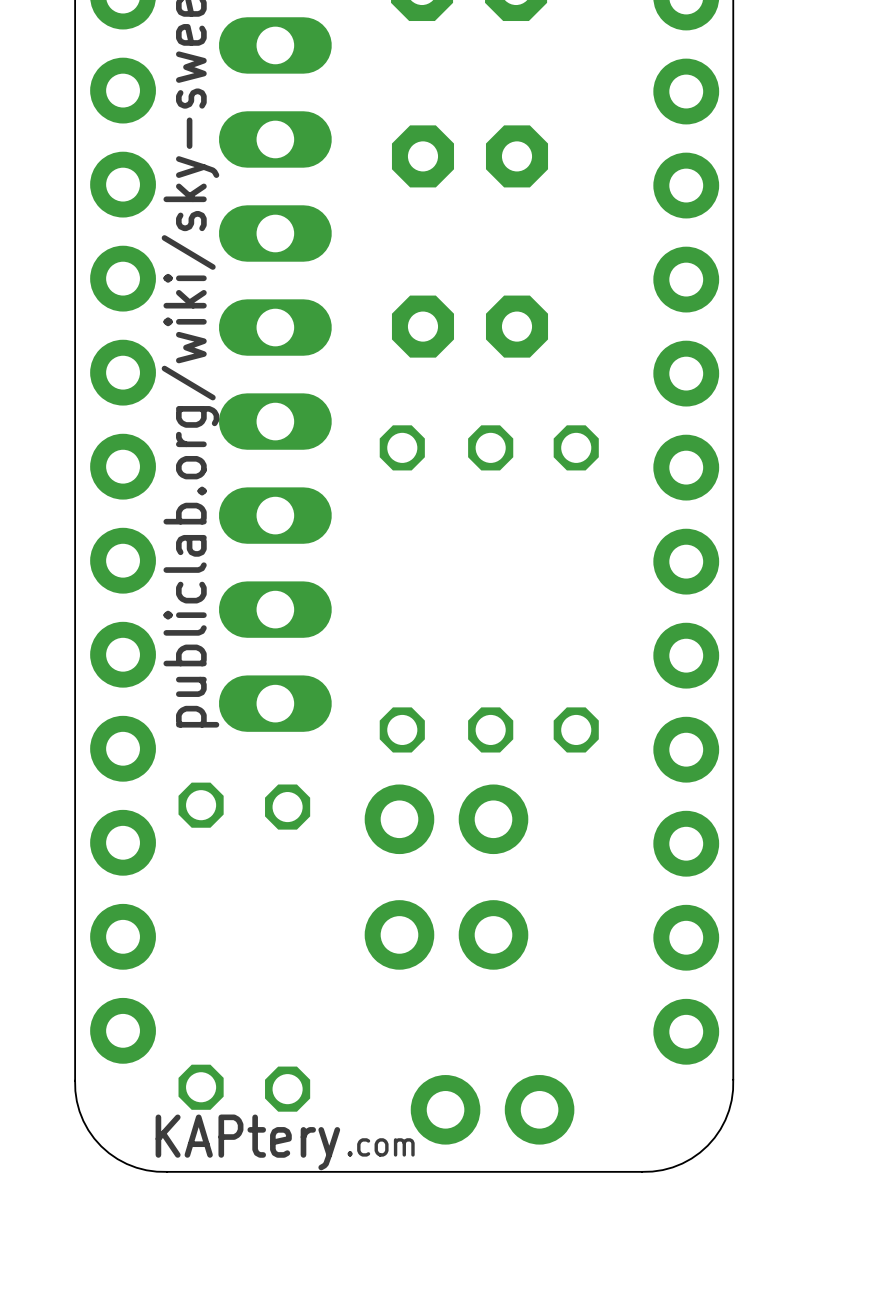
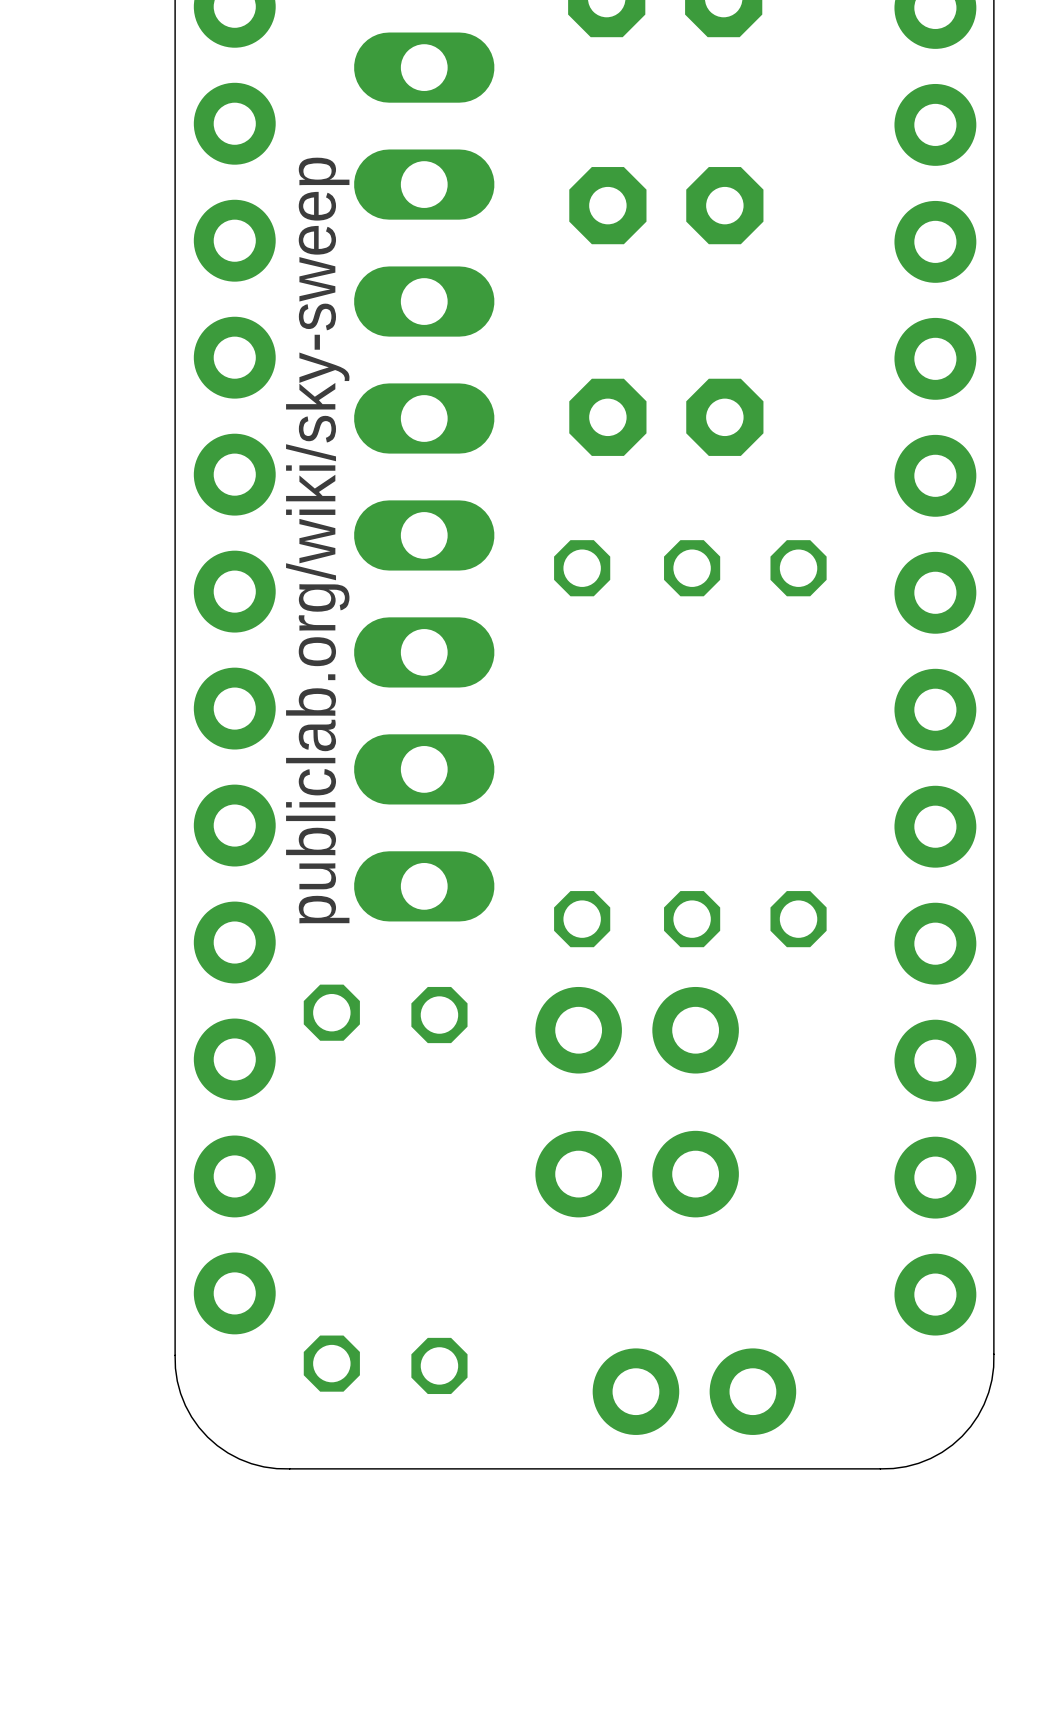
text: KAPtery (247, 1142) -> none
text: .com (381, 1147) -> none

